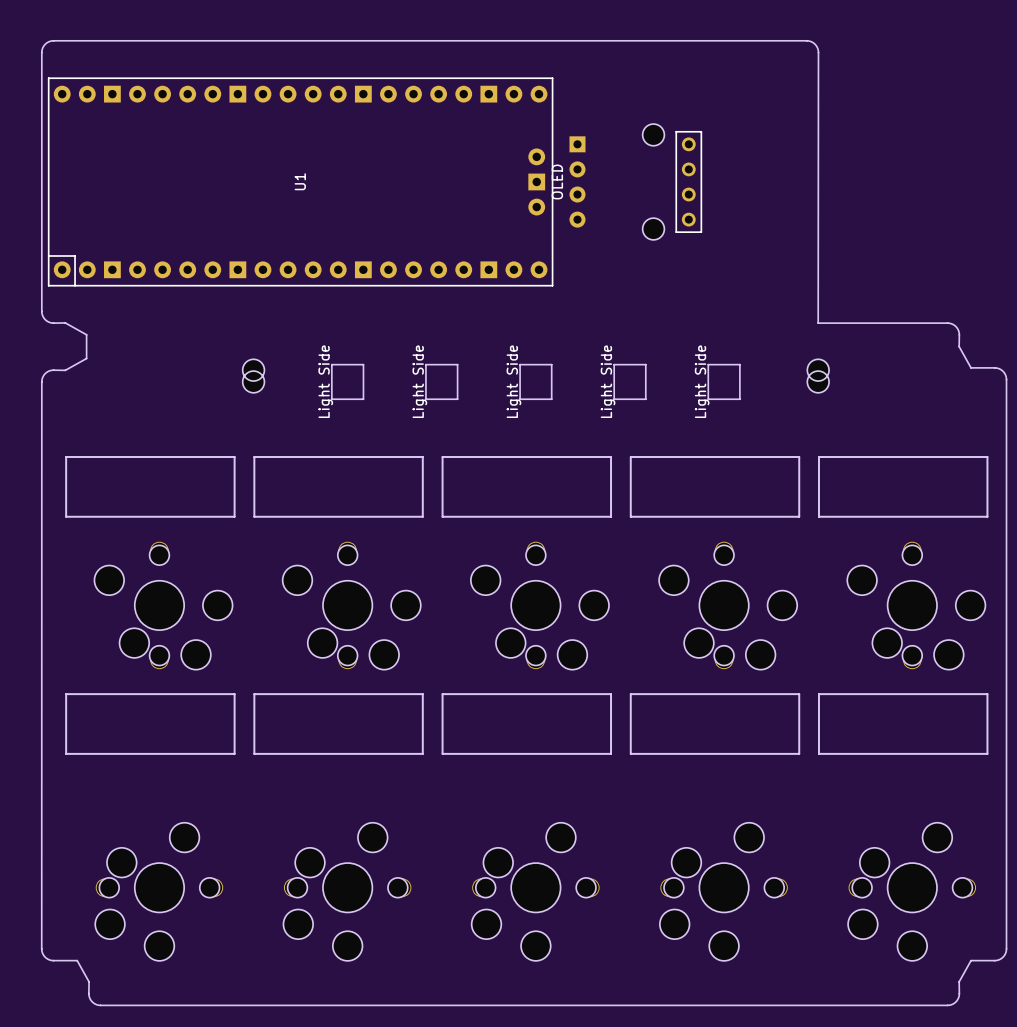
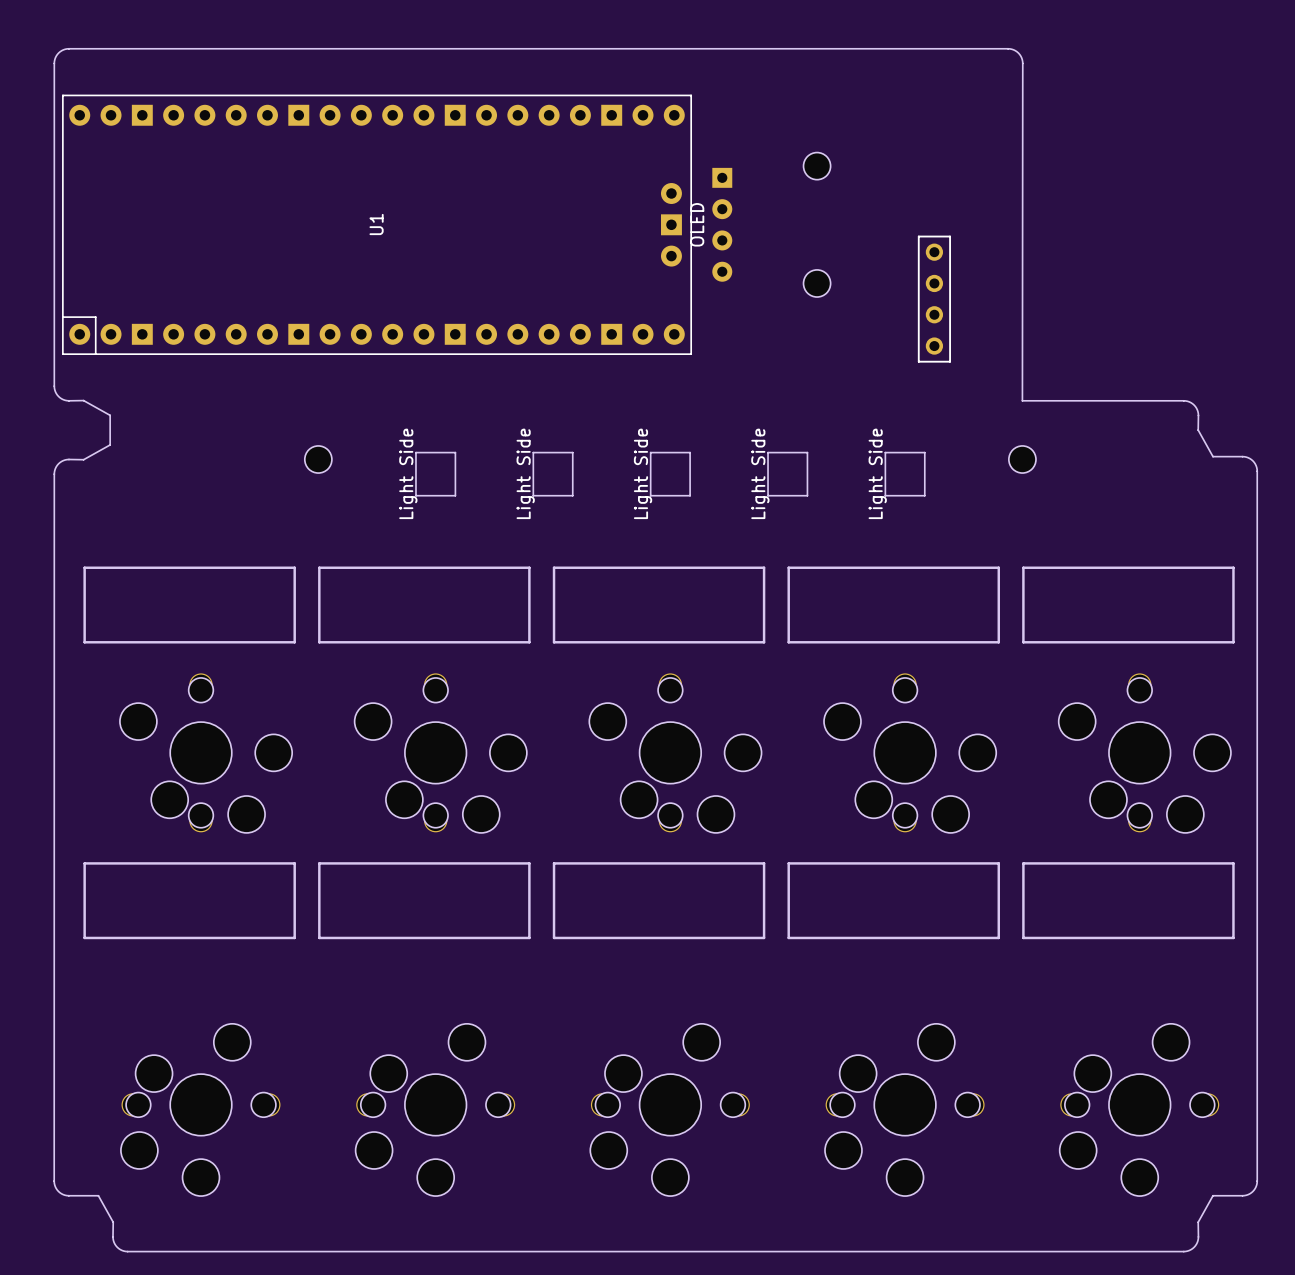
part position: (688, 181) -> (934, 299)
part: (253, 381) -> none
part: (818, 381) -> none

